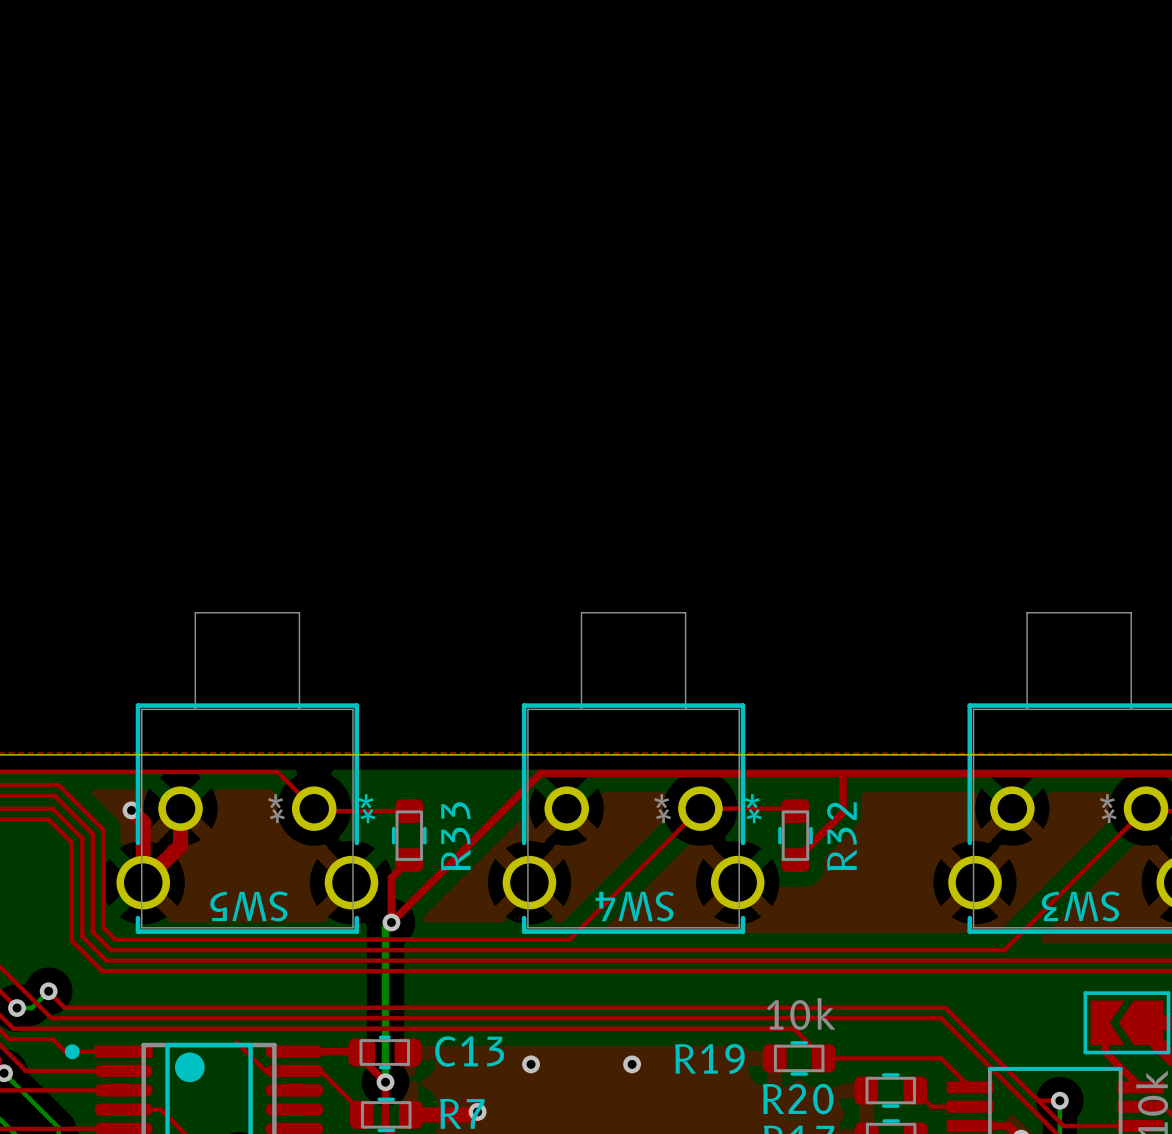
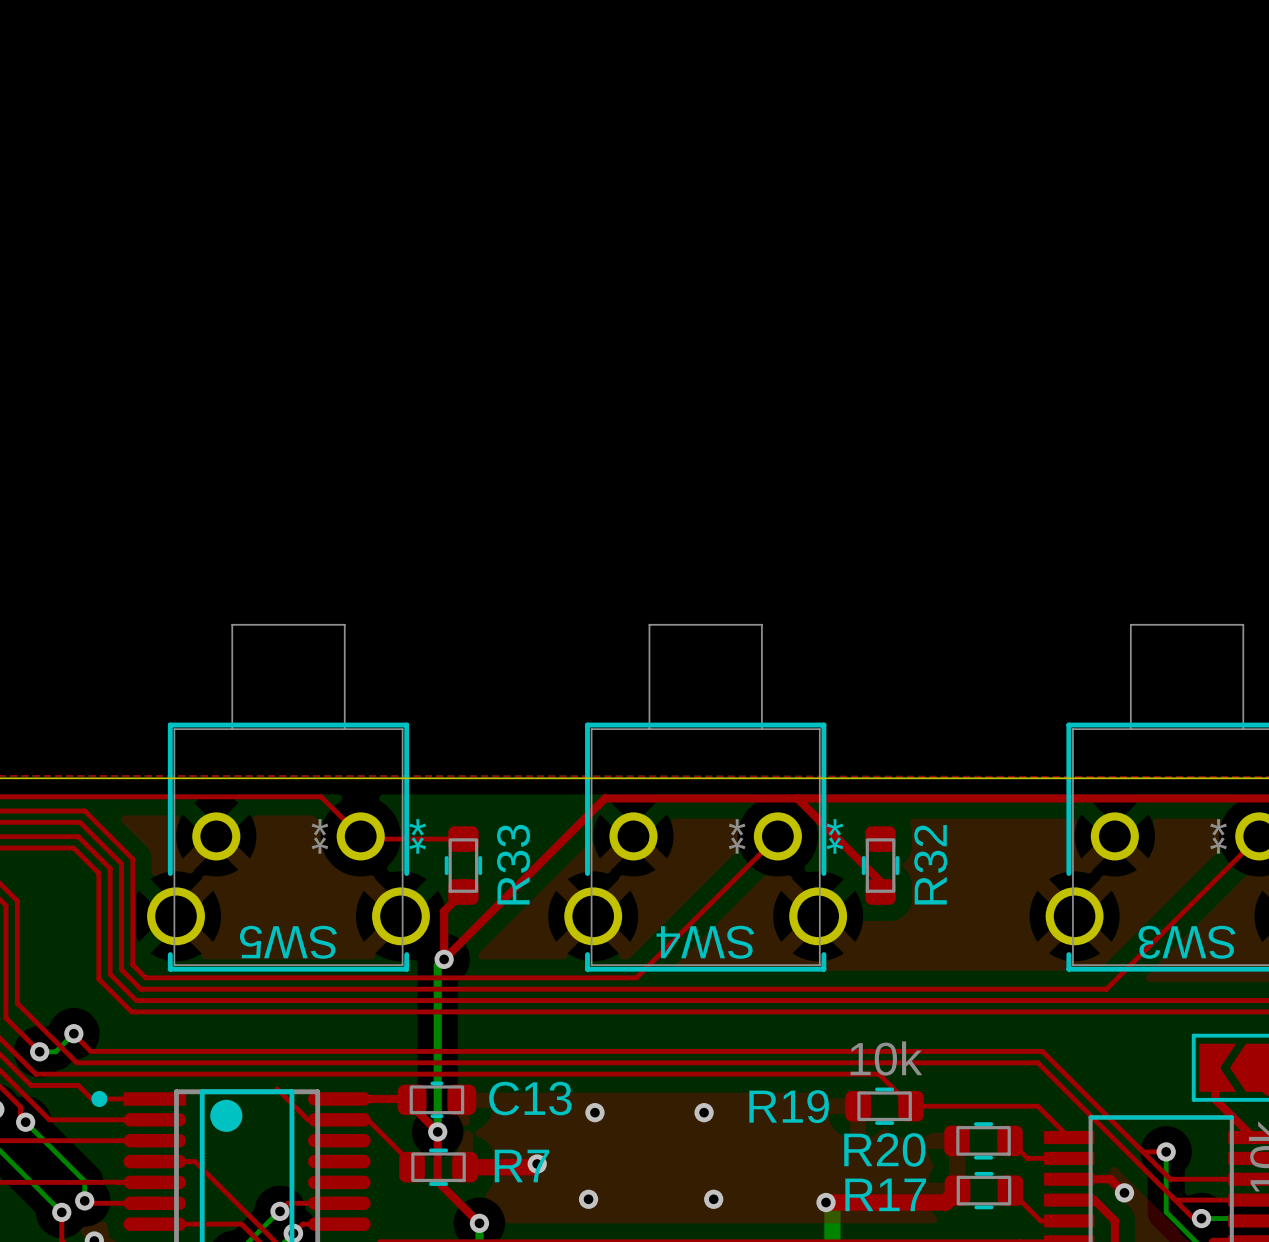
top track: (843, 773) (843, 812) (795, 860) -> (797, 798) (880, 881) (880, 892)
top track: (180, 808) (180, 845) (143, 882) (143, 822) (131, 810) -> none
top track: (700, 808) (793, 808) (795, 811) -> none
via: (131, 810) -> none

